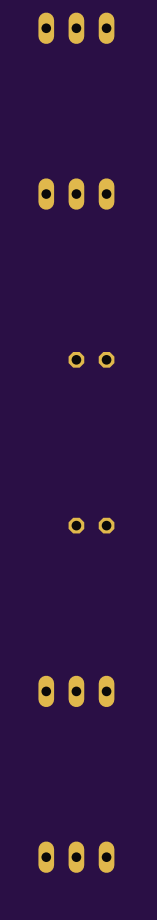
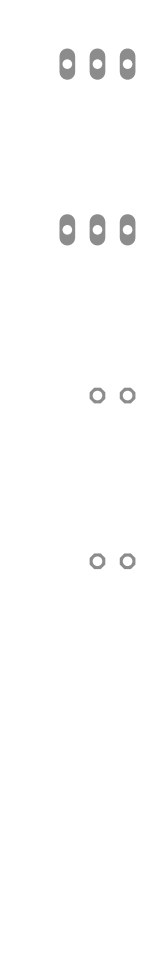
part: (76, 691) -> none
part: (76, 857) -> none

